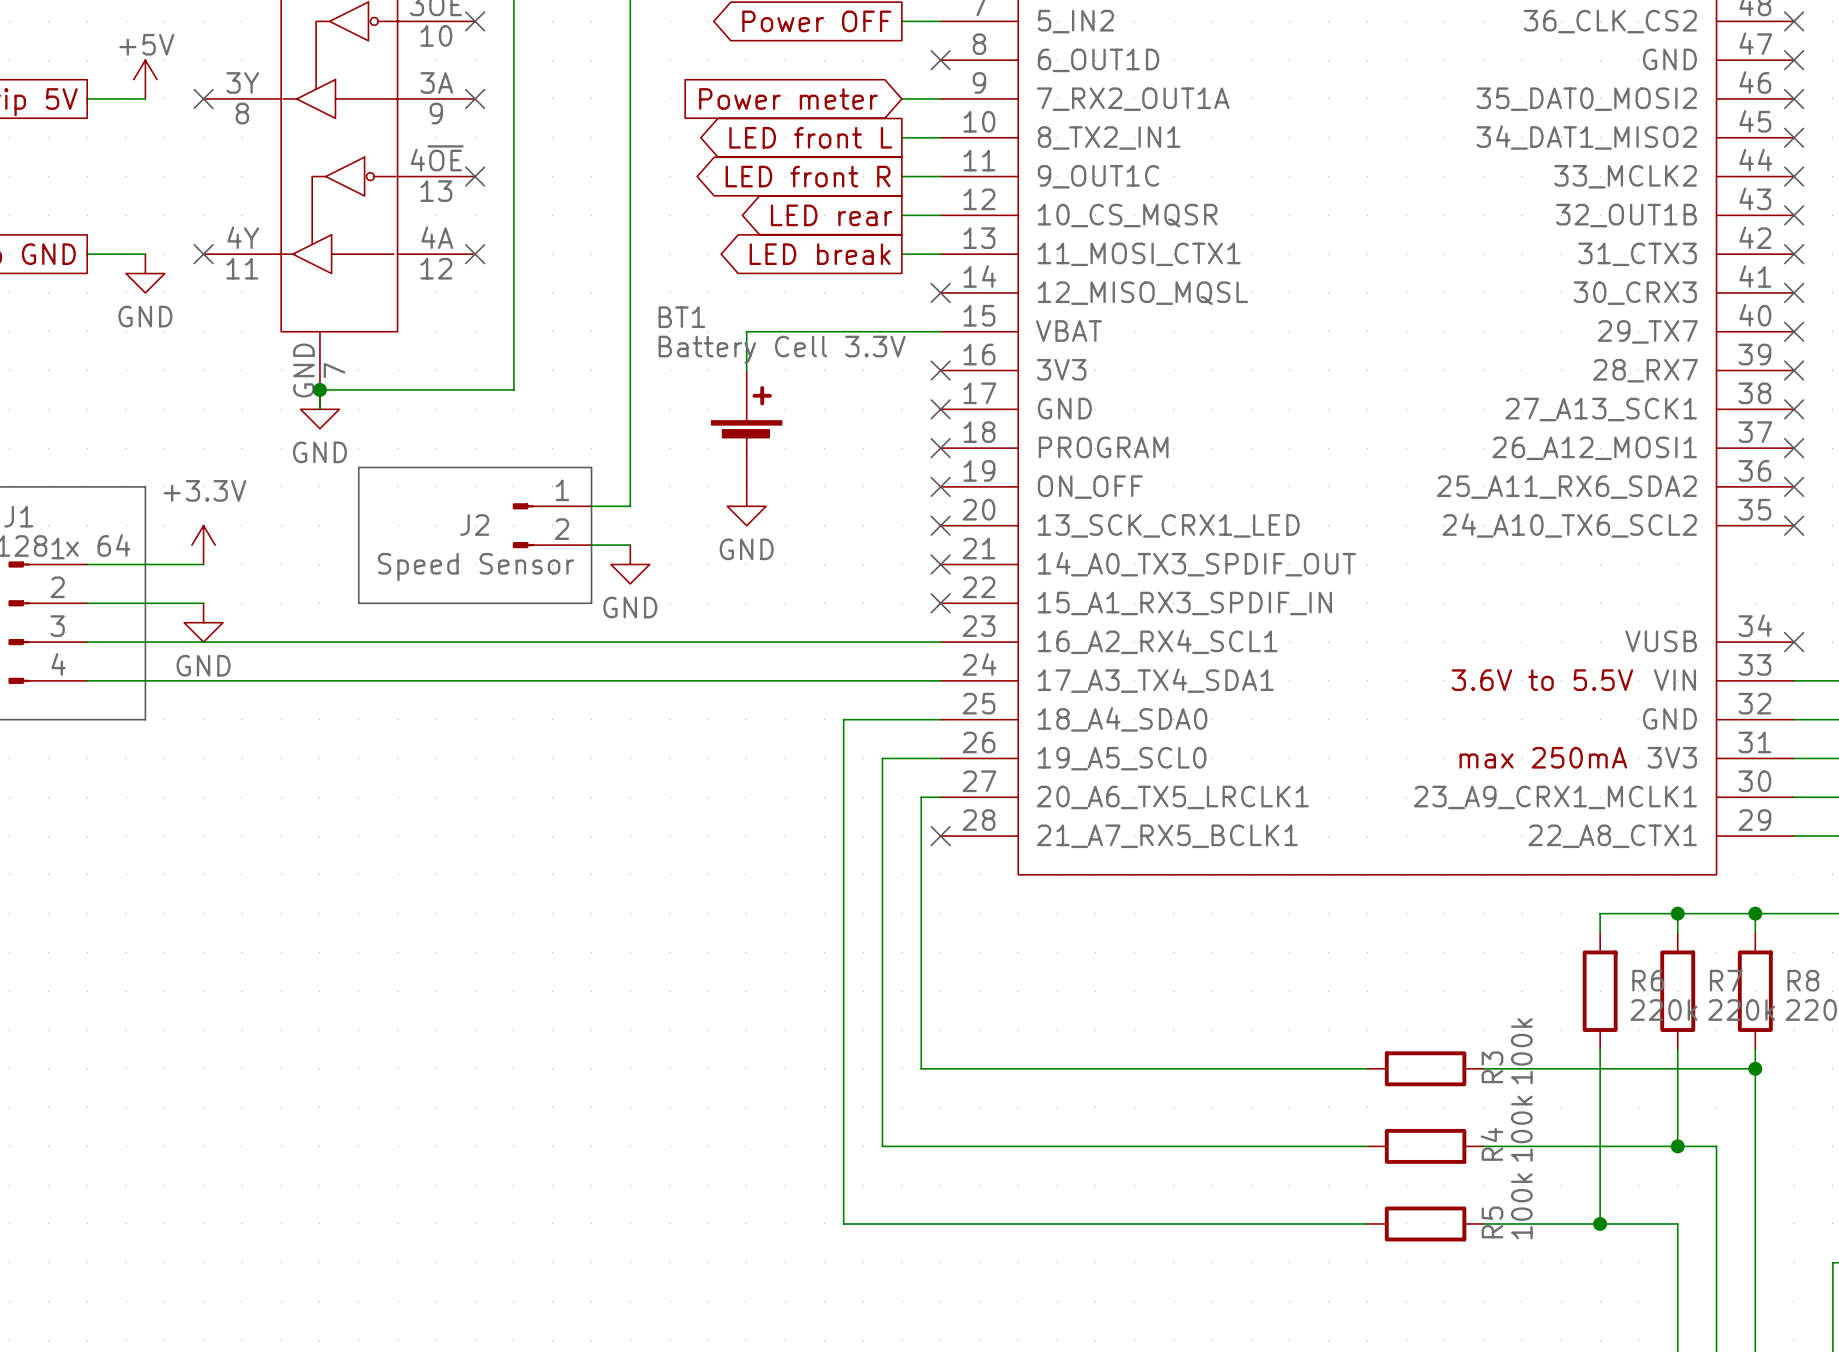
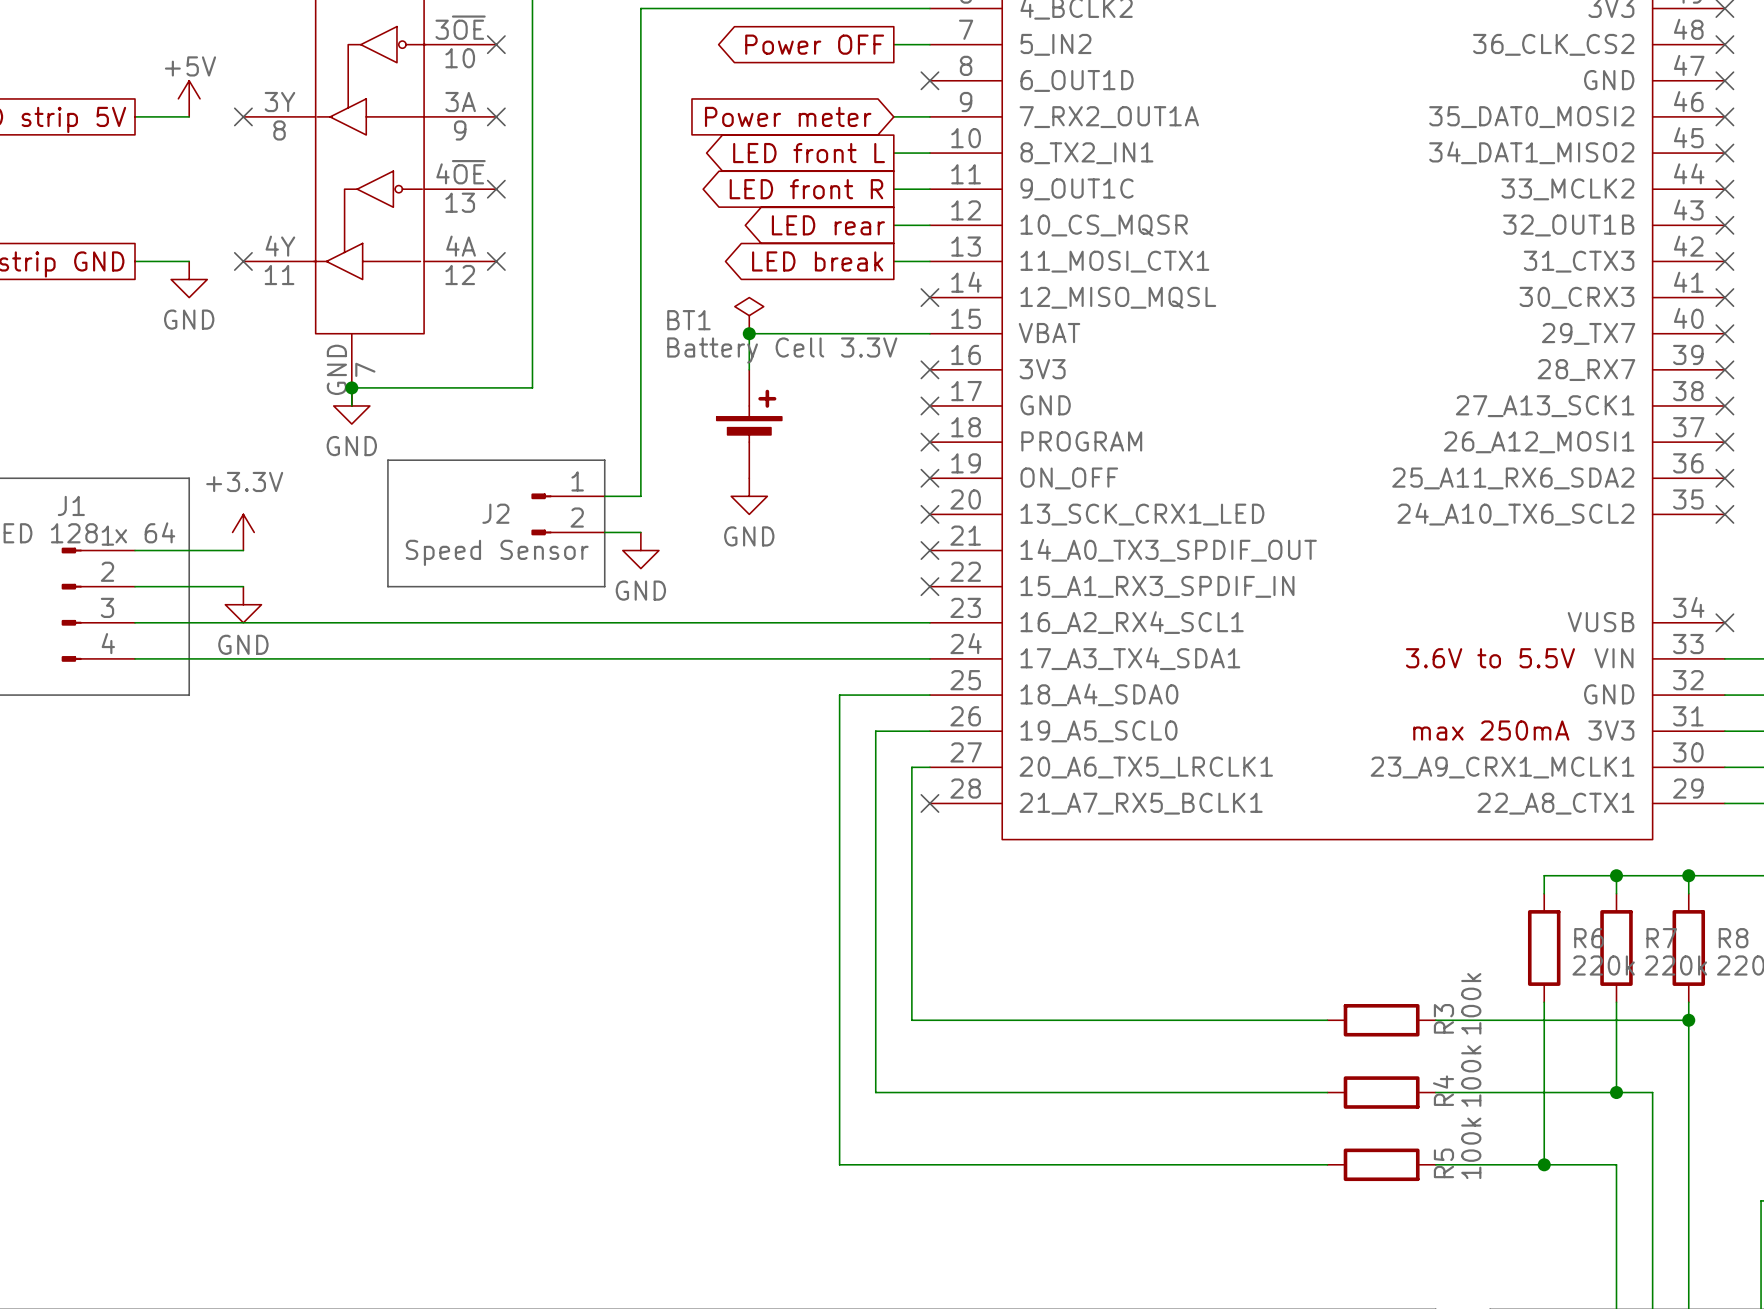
power symbol: none -> (749, 315)
junction: none -> (749, 333)
BT1 symbol: [711, 370, 782, 487] -> [716, 369, 782, 479]

